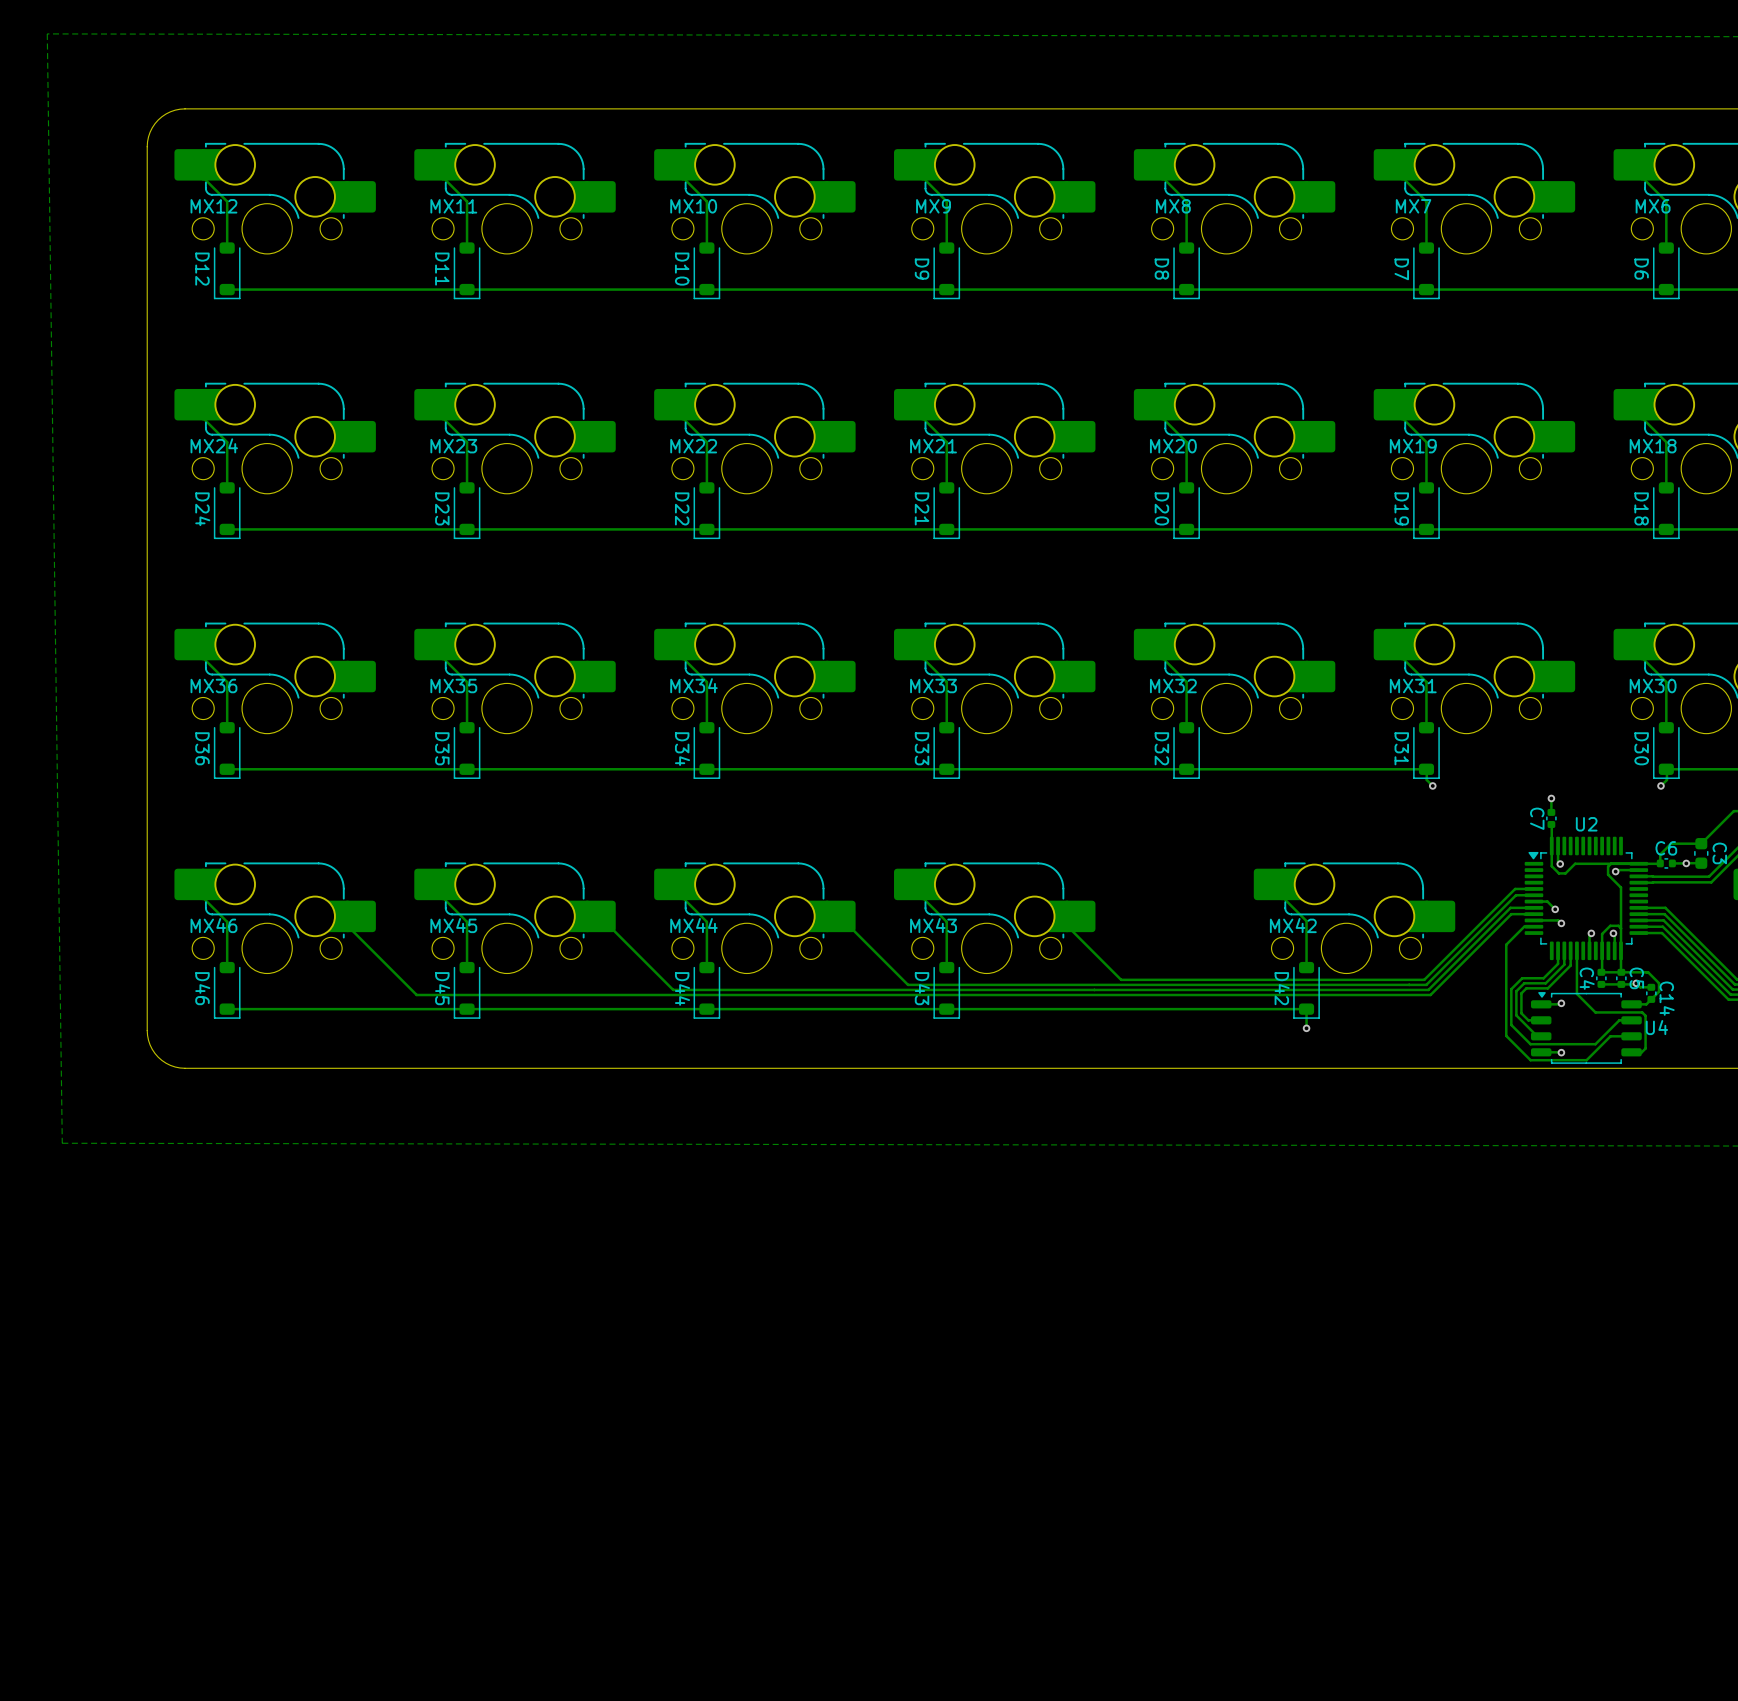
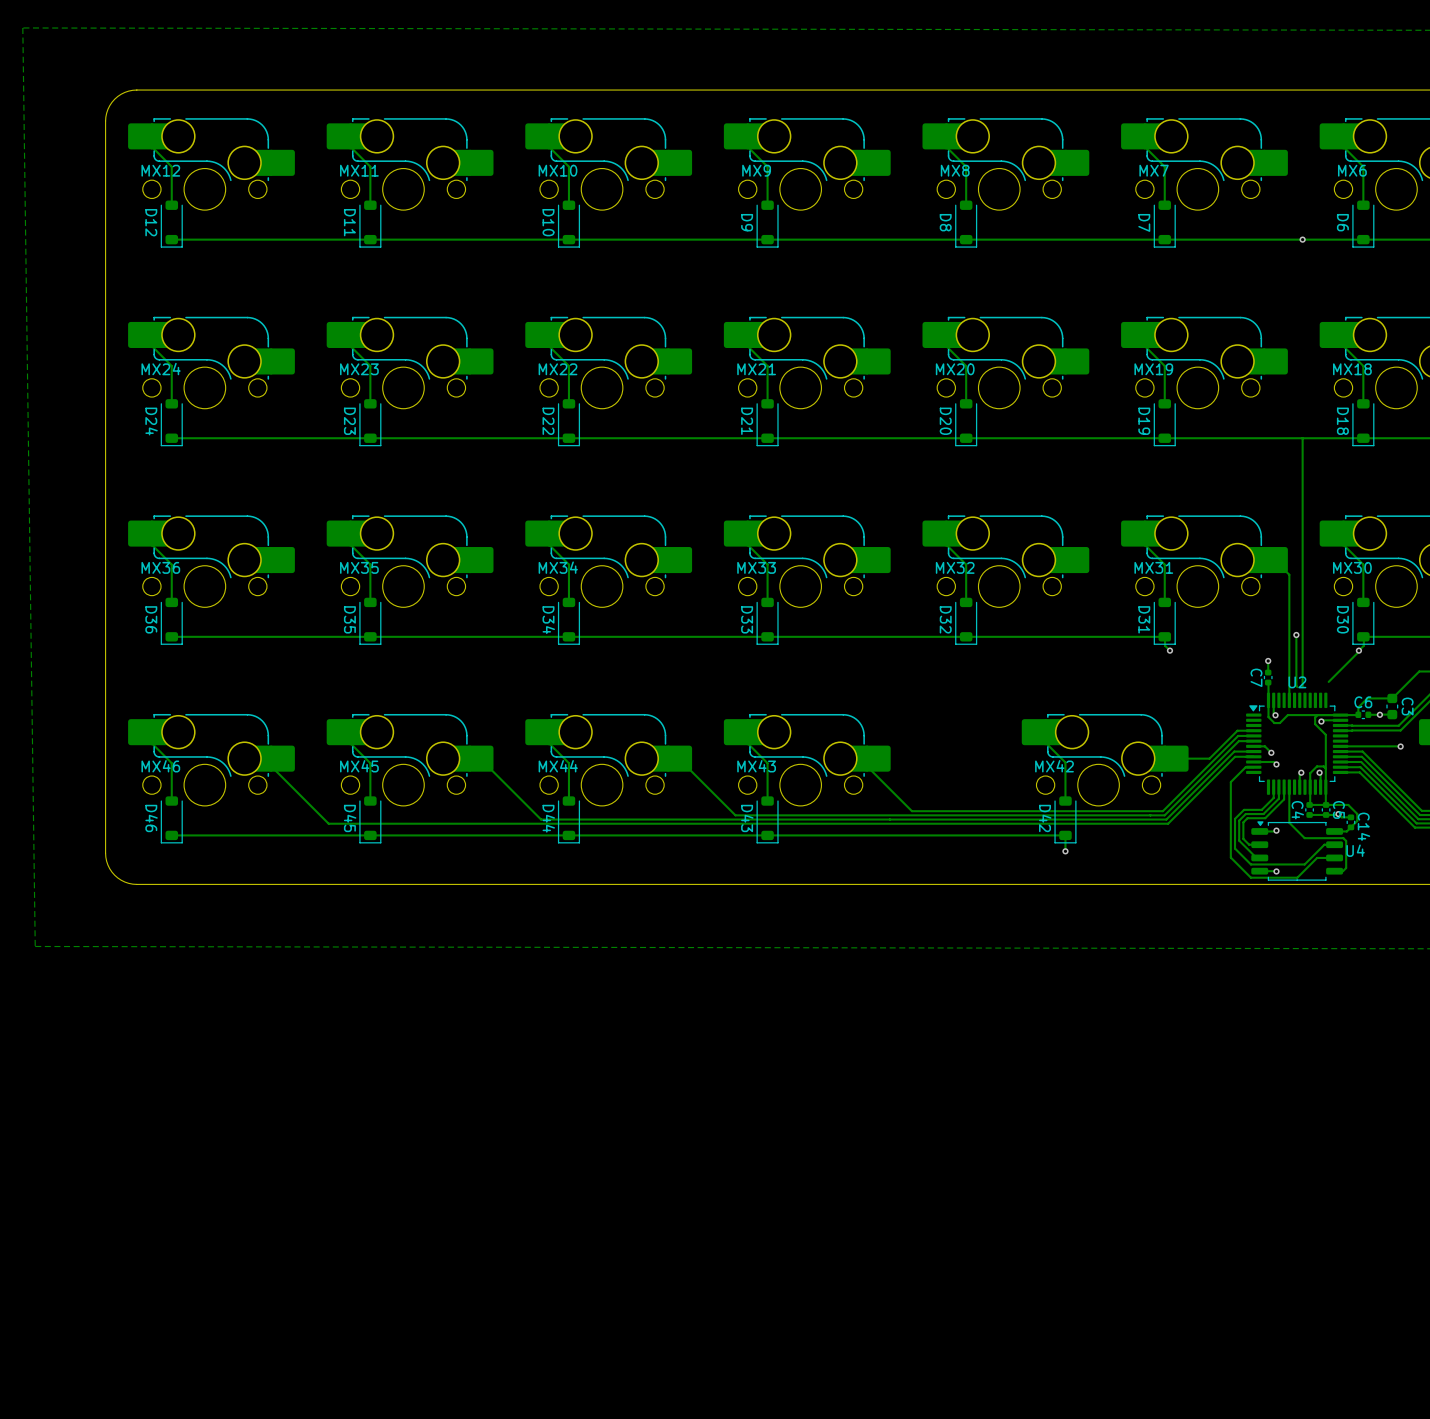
via: none -> (1302, 239)
track: none -> (1302, 438) (1302, 687)
track: none -> (1274, 560) (1289, 574) (1289, 700)
track: none -> (1296, 635) (1297, 687)
via: none -> (1296, 635)
track: none -> (1358, 650) (1328, 681)
track: none -> (1253, 730) (1237, 730) (1209, 758) (1175, 758)
track: none -> (1340, 746) (1400, 746)
via: none -> (1400, 746)

